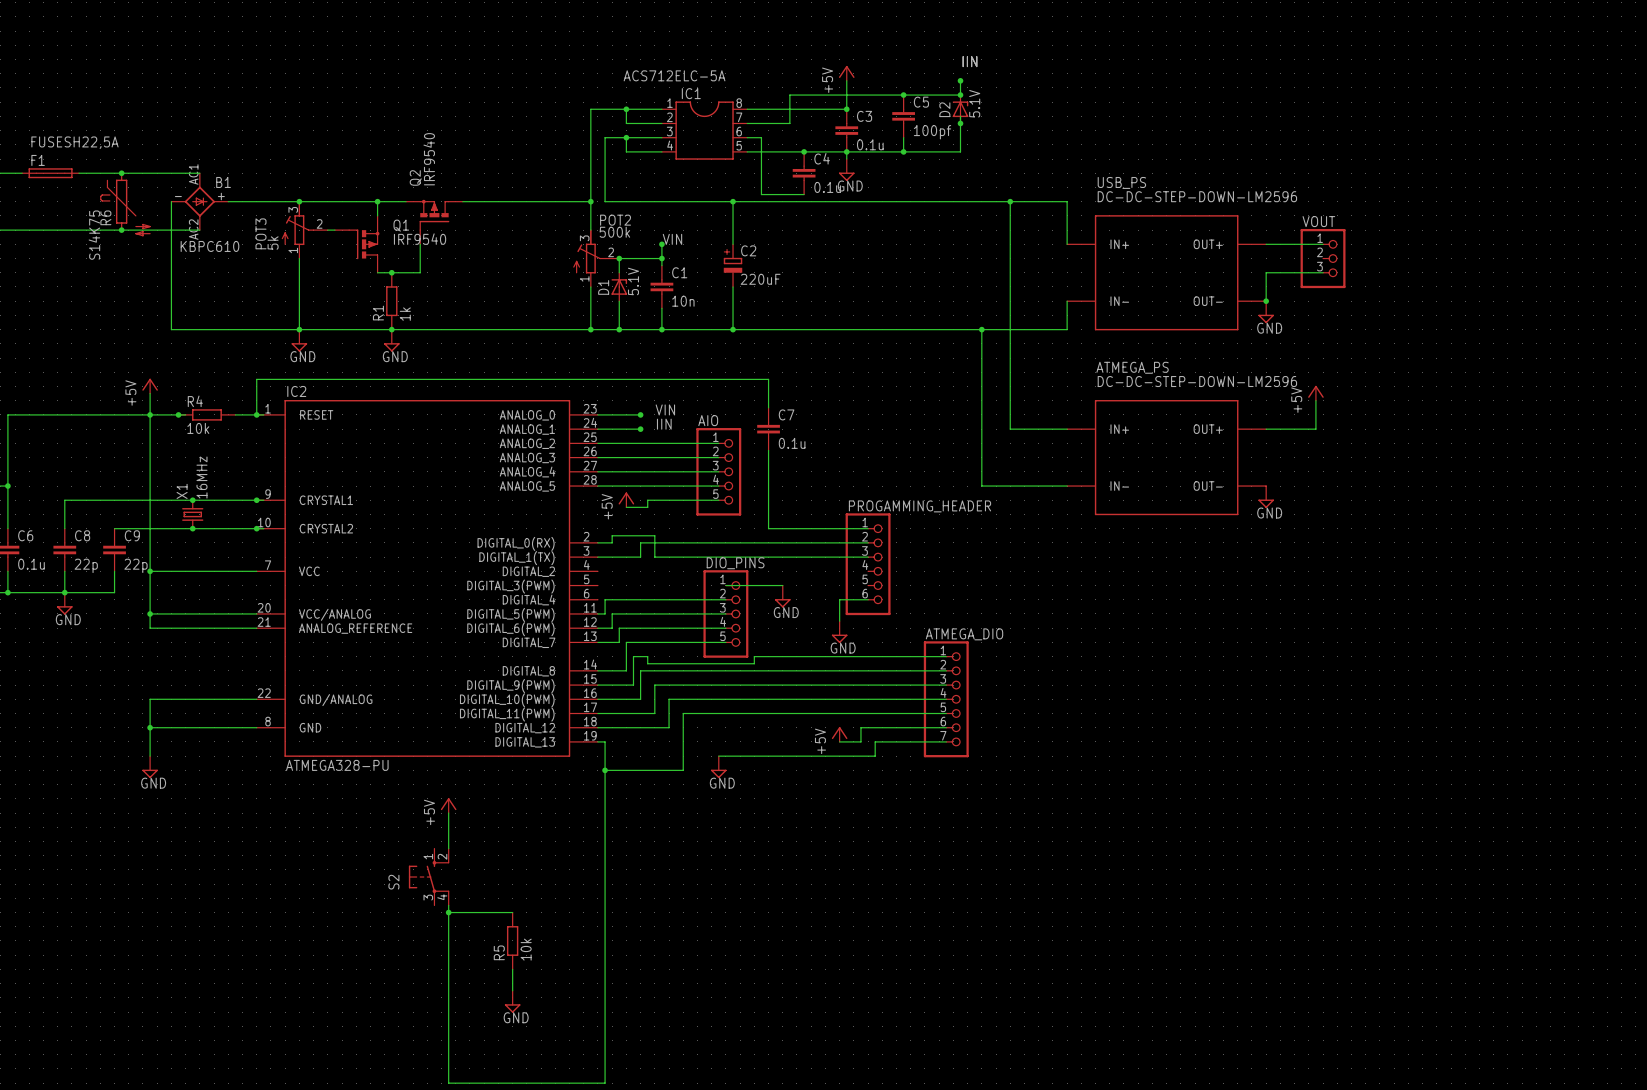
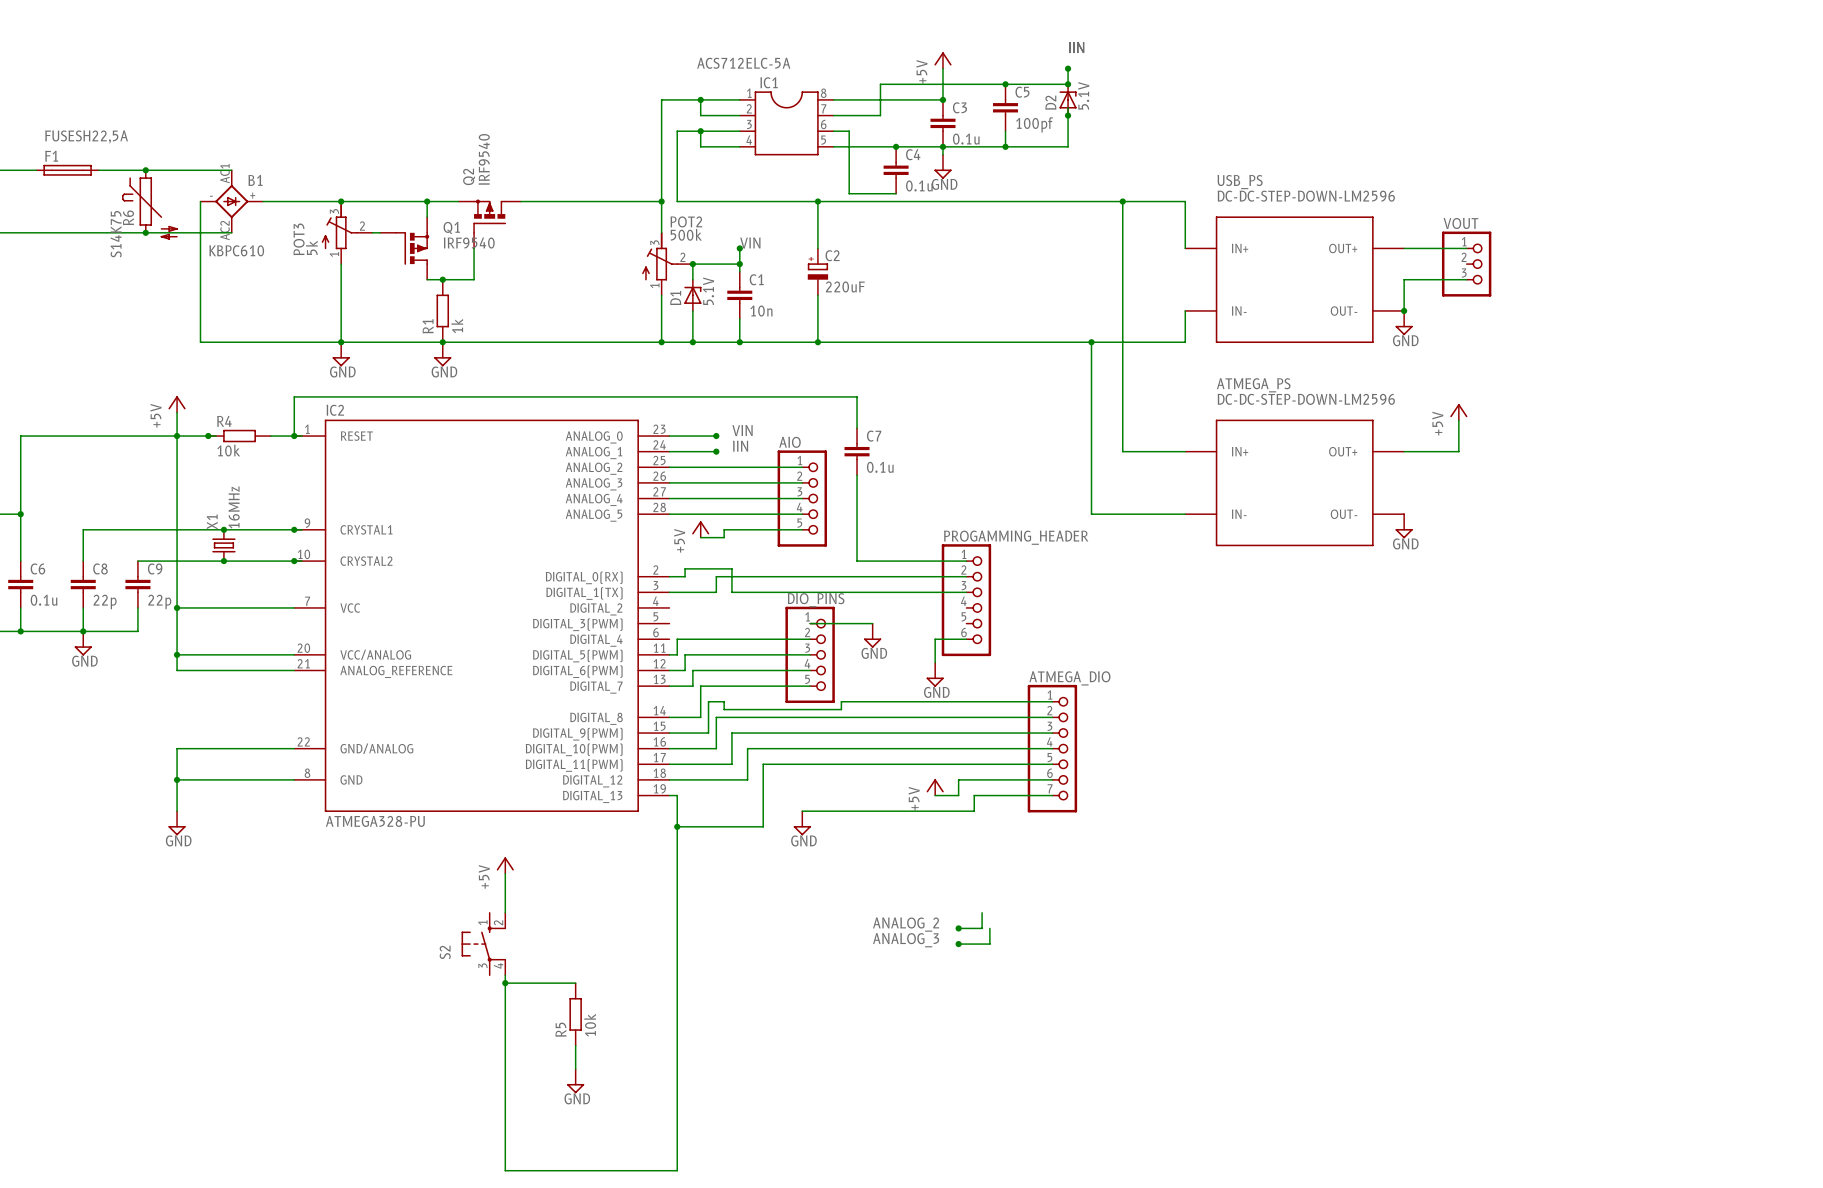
wire: none -> (982, 912) (982, 928) (958, 928)
label: none -> ANALOG_2 (906, 924)
junction: none -> (958, 928)
wire: none -> (989, 928) (989, 944) (958, 944)
label: none -> ANALOG_3 (906, 940)
junction: none -> (958, 944)

